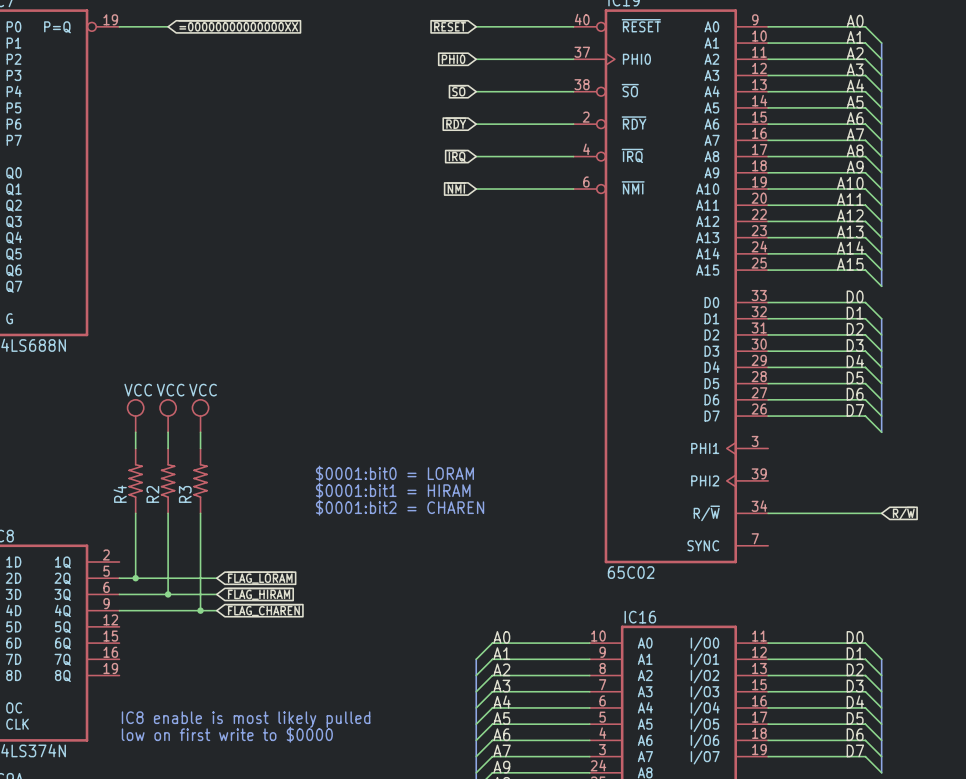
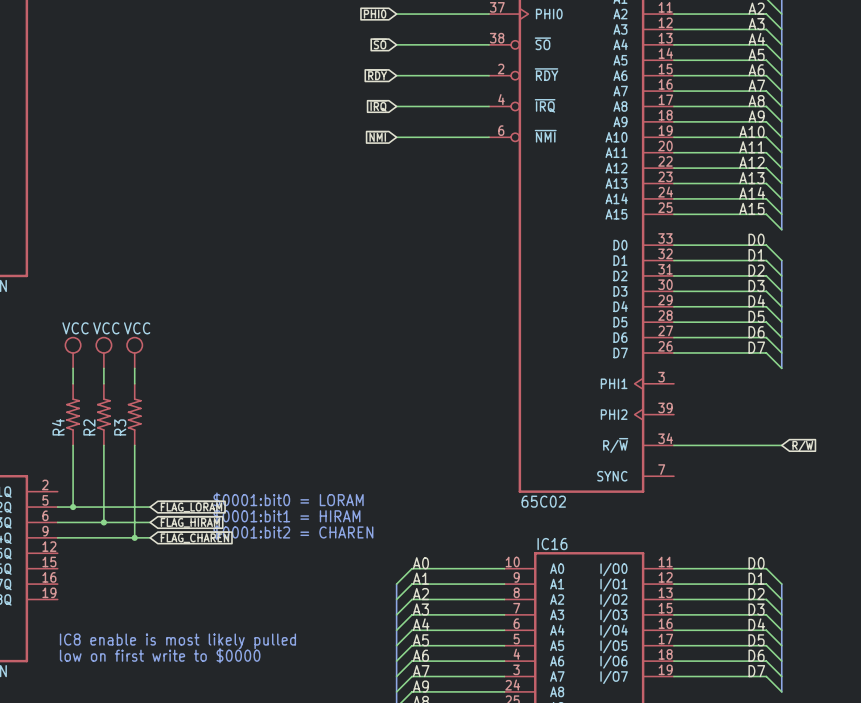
text position: $0001:bit0 = LORAM (394, 473) -> $0001:bit0 = LORAM (288, 500)
text position: $0001:bit1 = HIRAM (393, 490) -> $0001:bit1 = HIRAM (286, 516)
text position: $0001:bit2 = CHAREN (400, 507) -> $0001:bit2 = CHAREN (293, 532)

